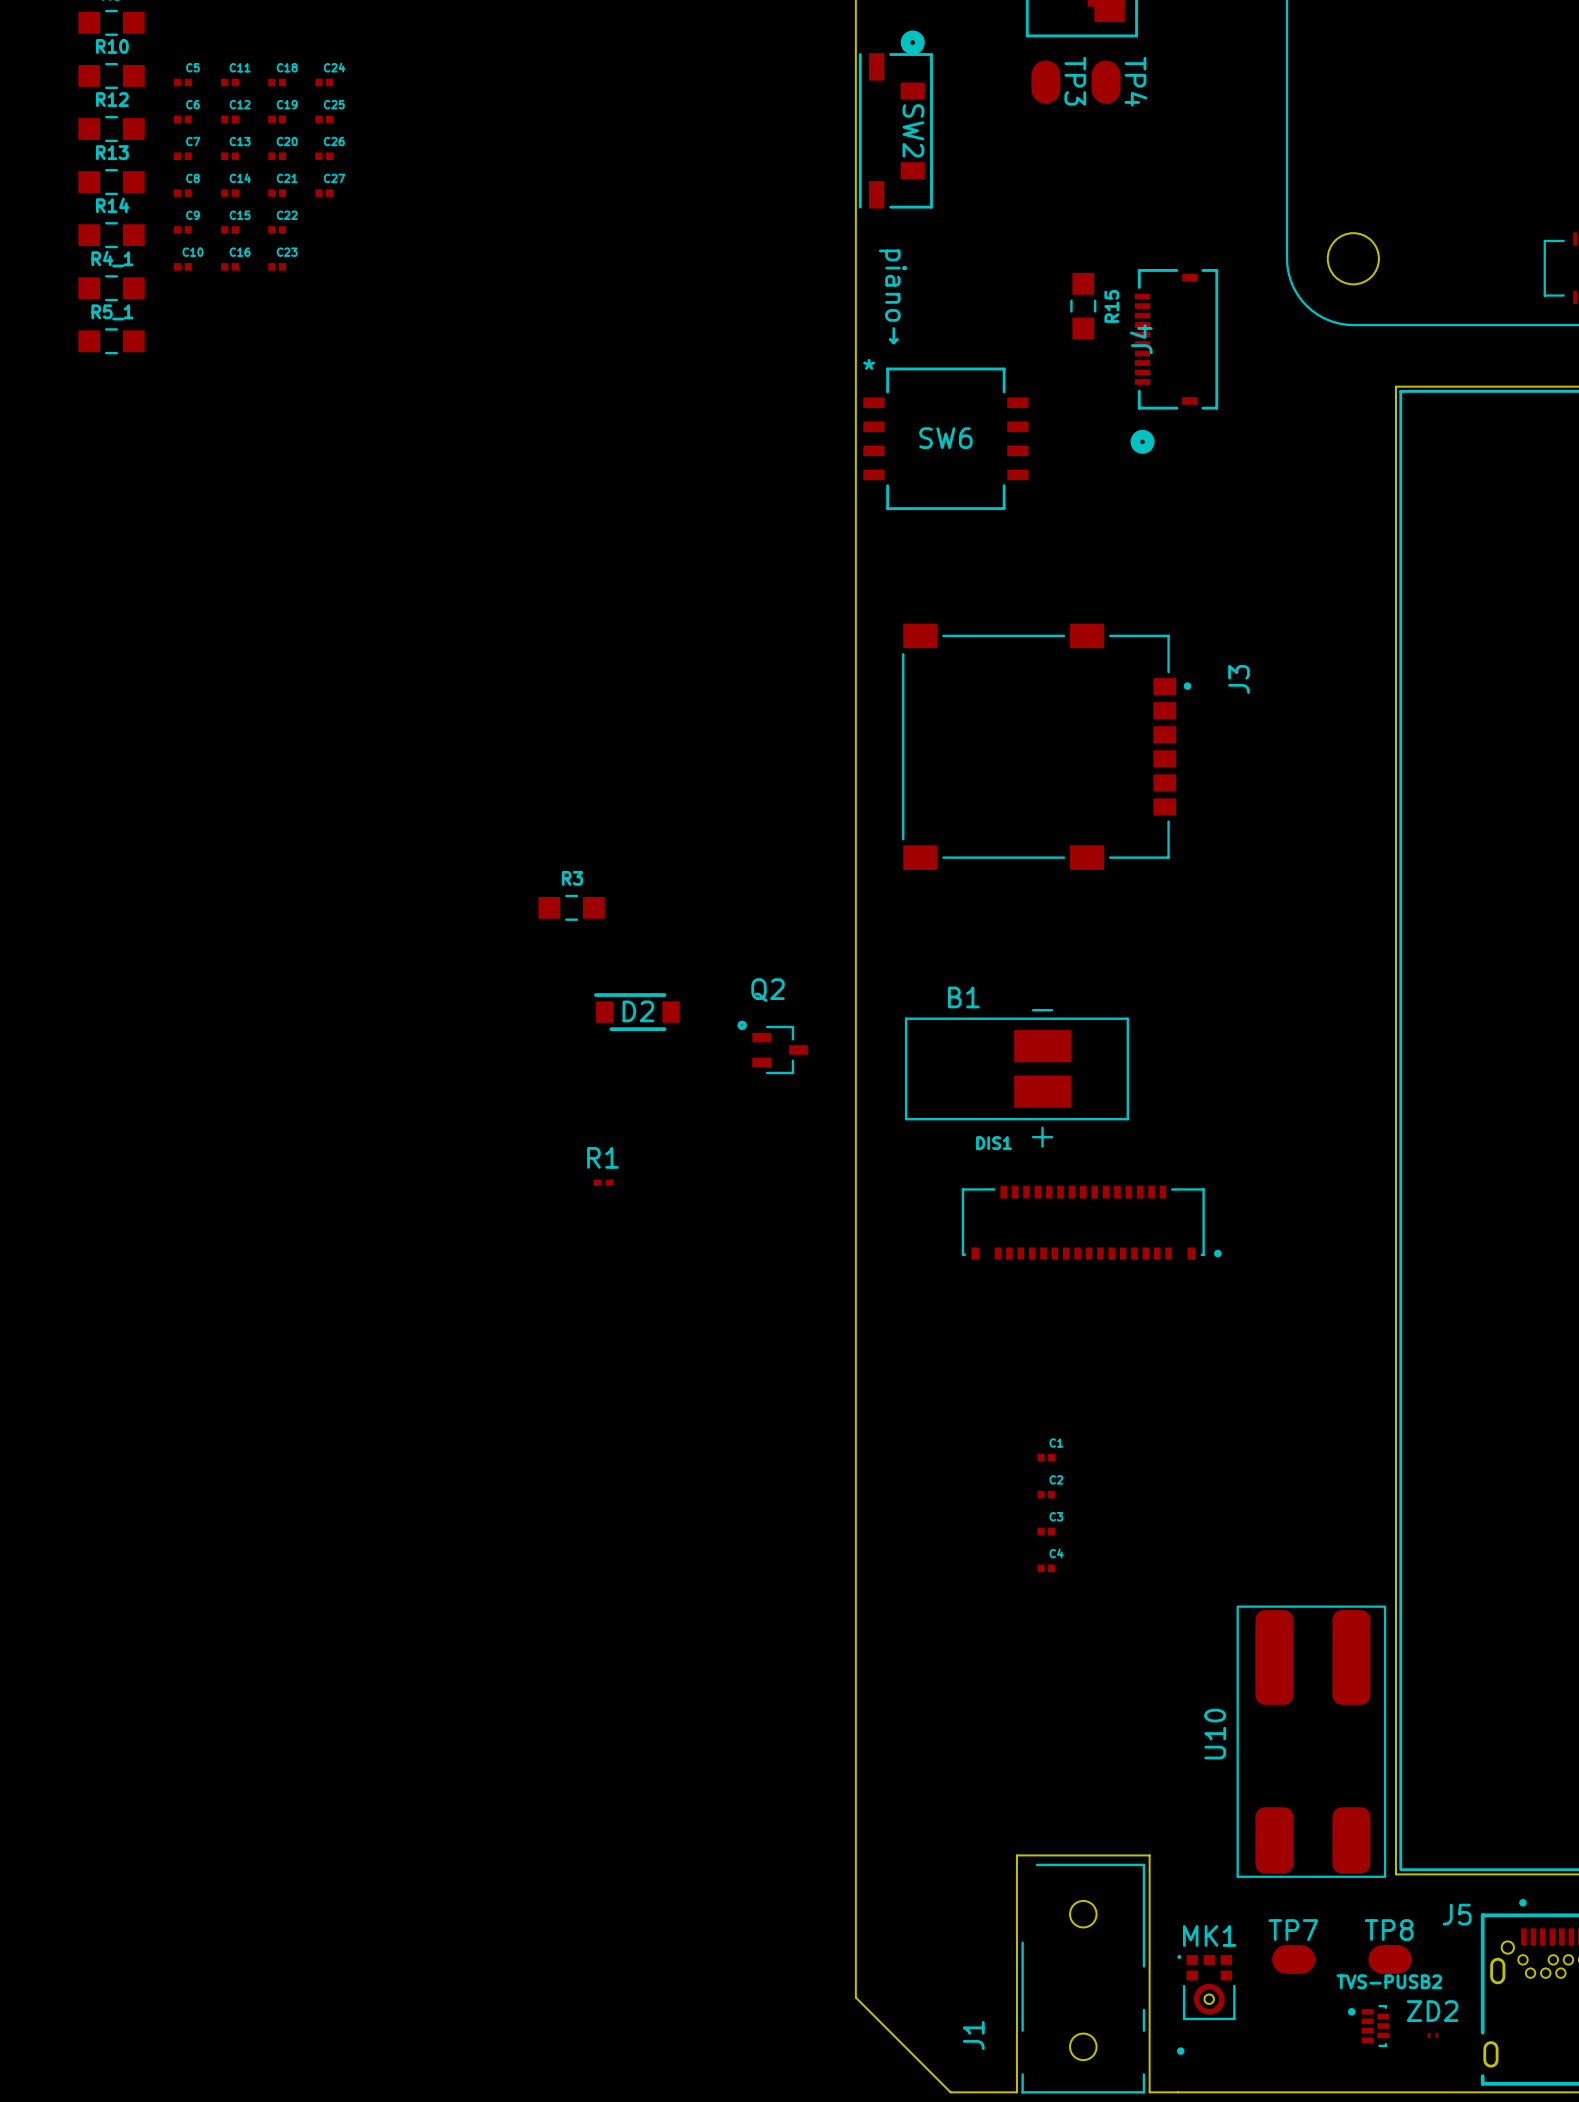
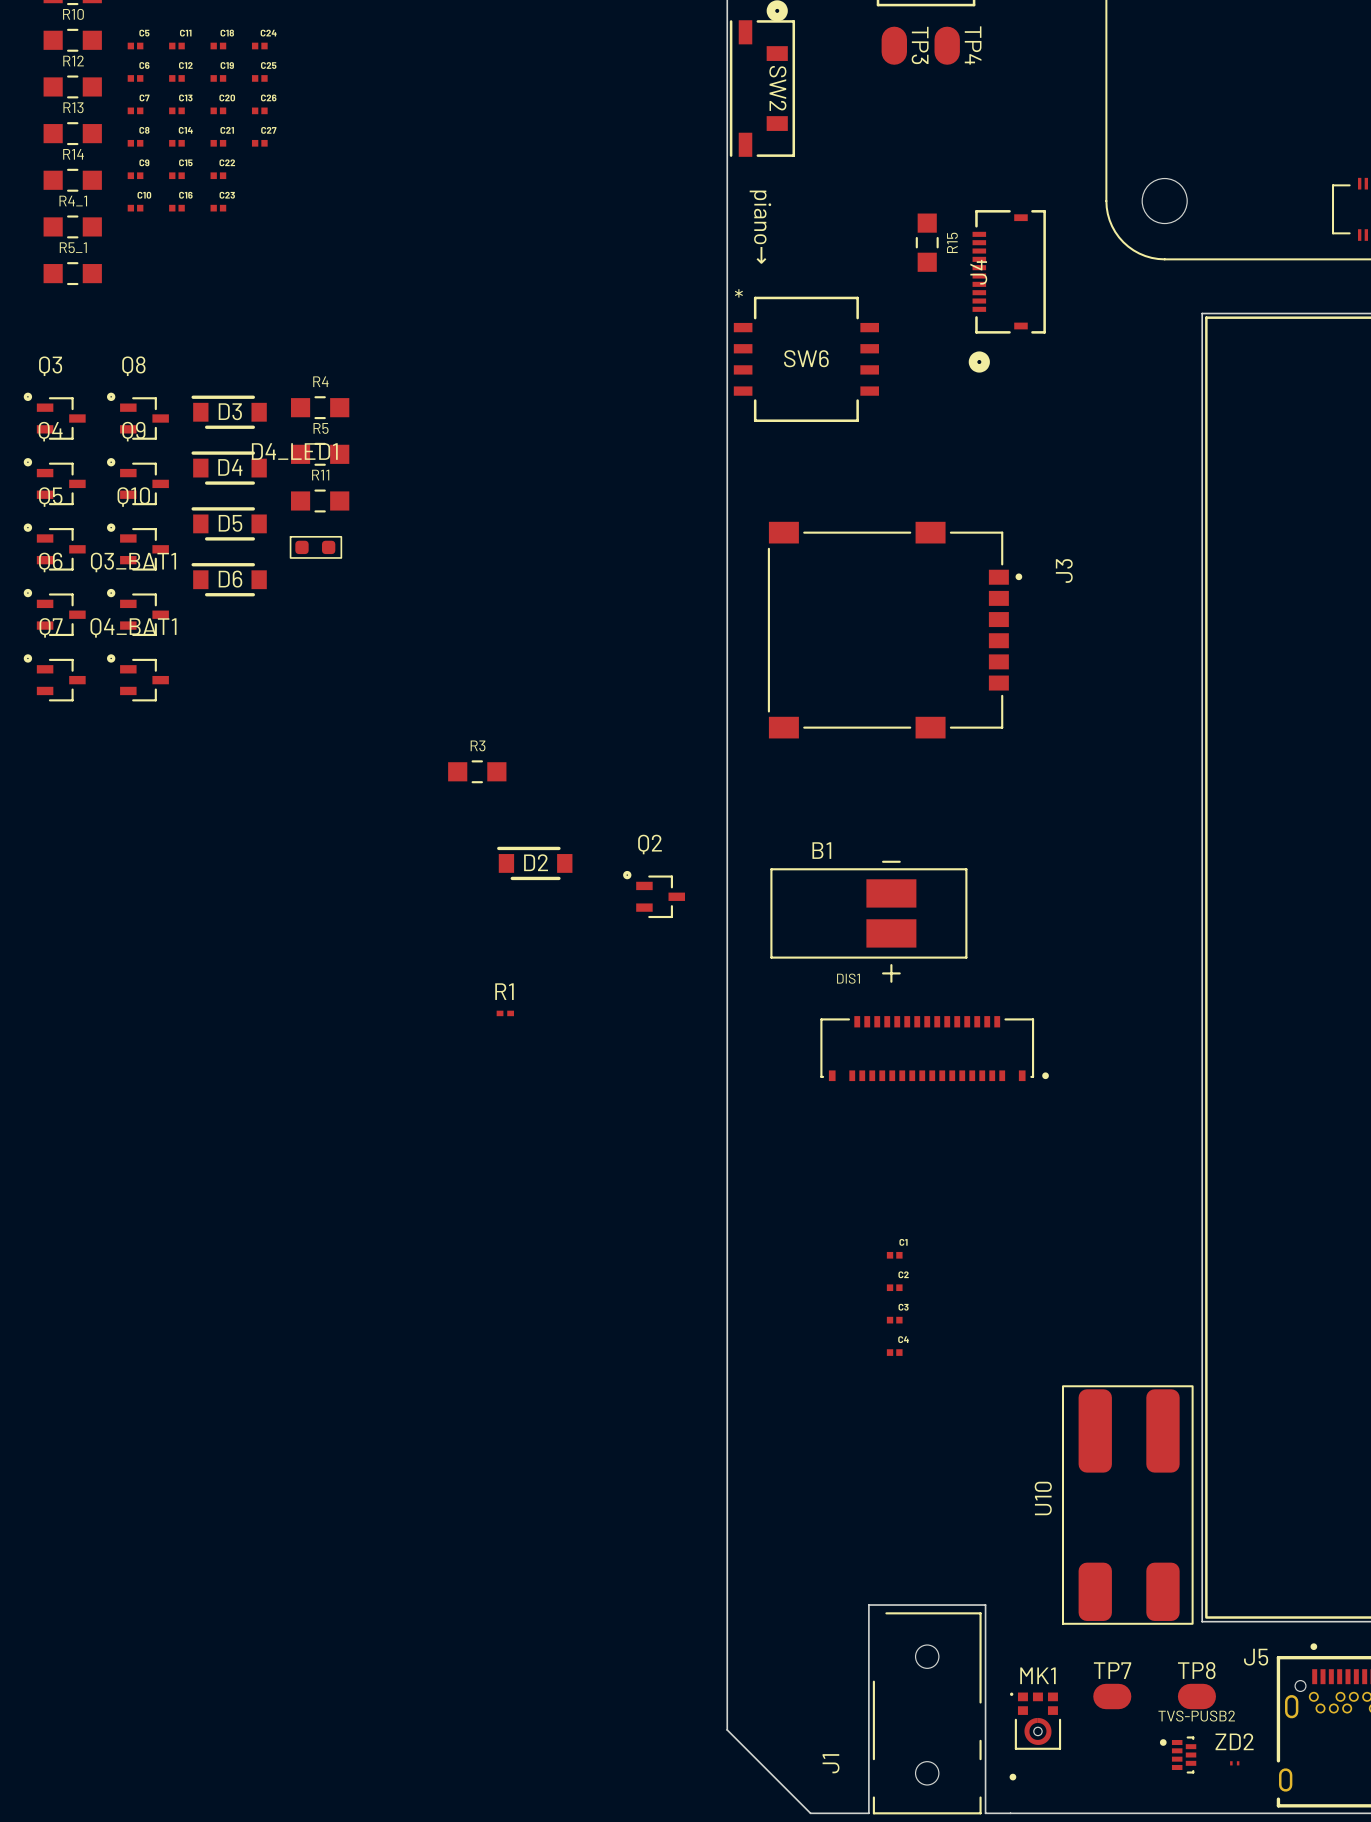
R4: none -> (320, 407)
D3: none -> (229, 412)
Q3: none -> (54, 416)
Q8: none -> (137, 416)
R5: none -> (320, 454)
D4: none -> (229, 468)
Q4: none -> (54, 481)
Q9: none -> (137, 481)
R11: none -> (320, 500)
D5: none -> (229, 523)
Q5: none -> (54, 547)
Q10: none -> (137, 547)
D4_LED1: none -> (315, 547)
D6: none -> (229, 579)
Q6: none -> (54, 612)
Q3_BAT1: none -> (137, 612)
Q7: none -> (54, 677)
Q4_BAT1: none -> (137, 677)

